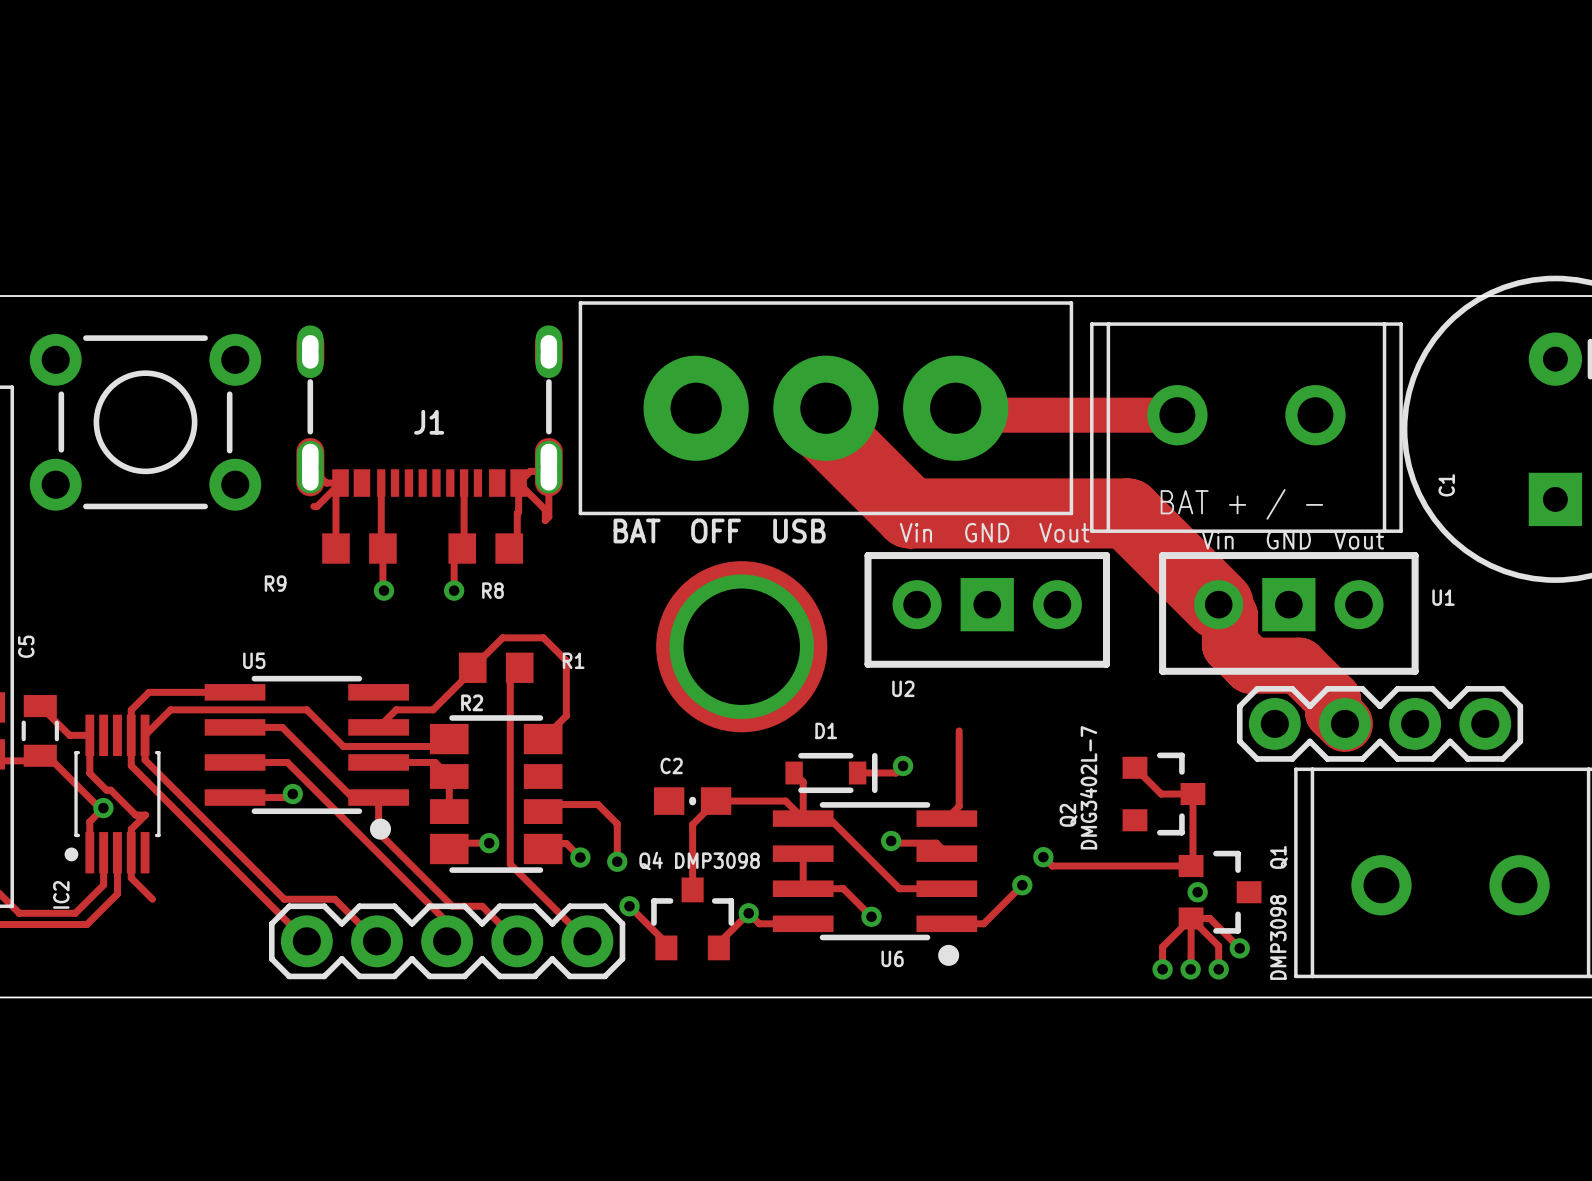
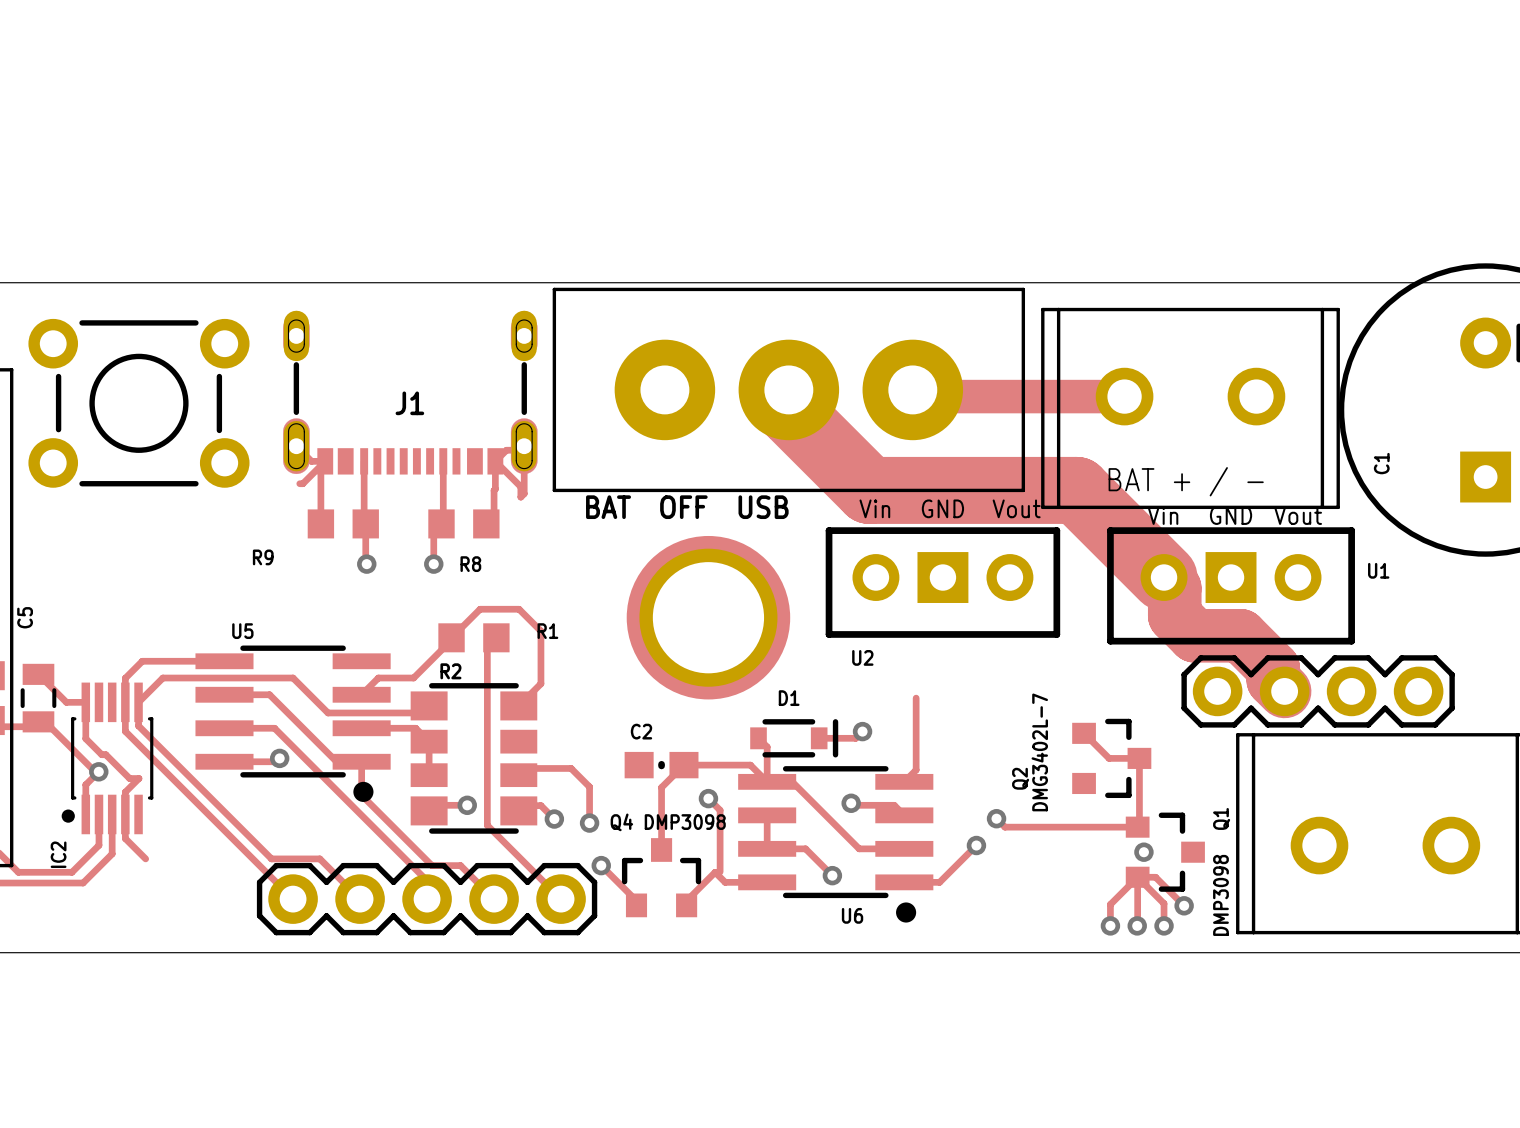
J1 footprint: [296, 325, 563, 497] -> [283, 310, 538, 475]
track: none -> (708, 798) (720, 810) (720, 871)
via position: (748, 913) -> (708, 798)

